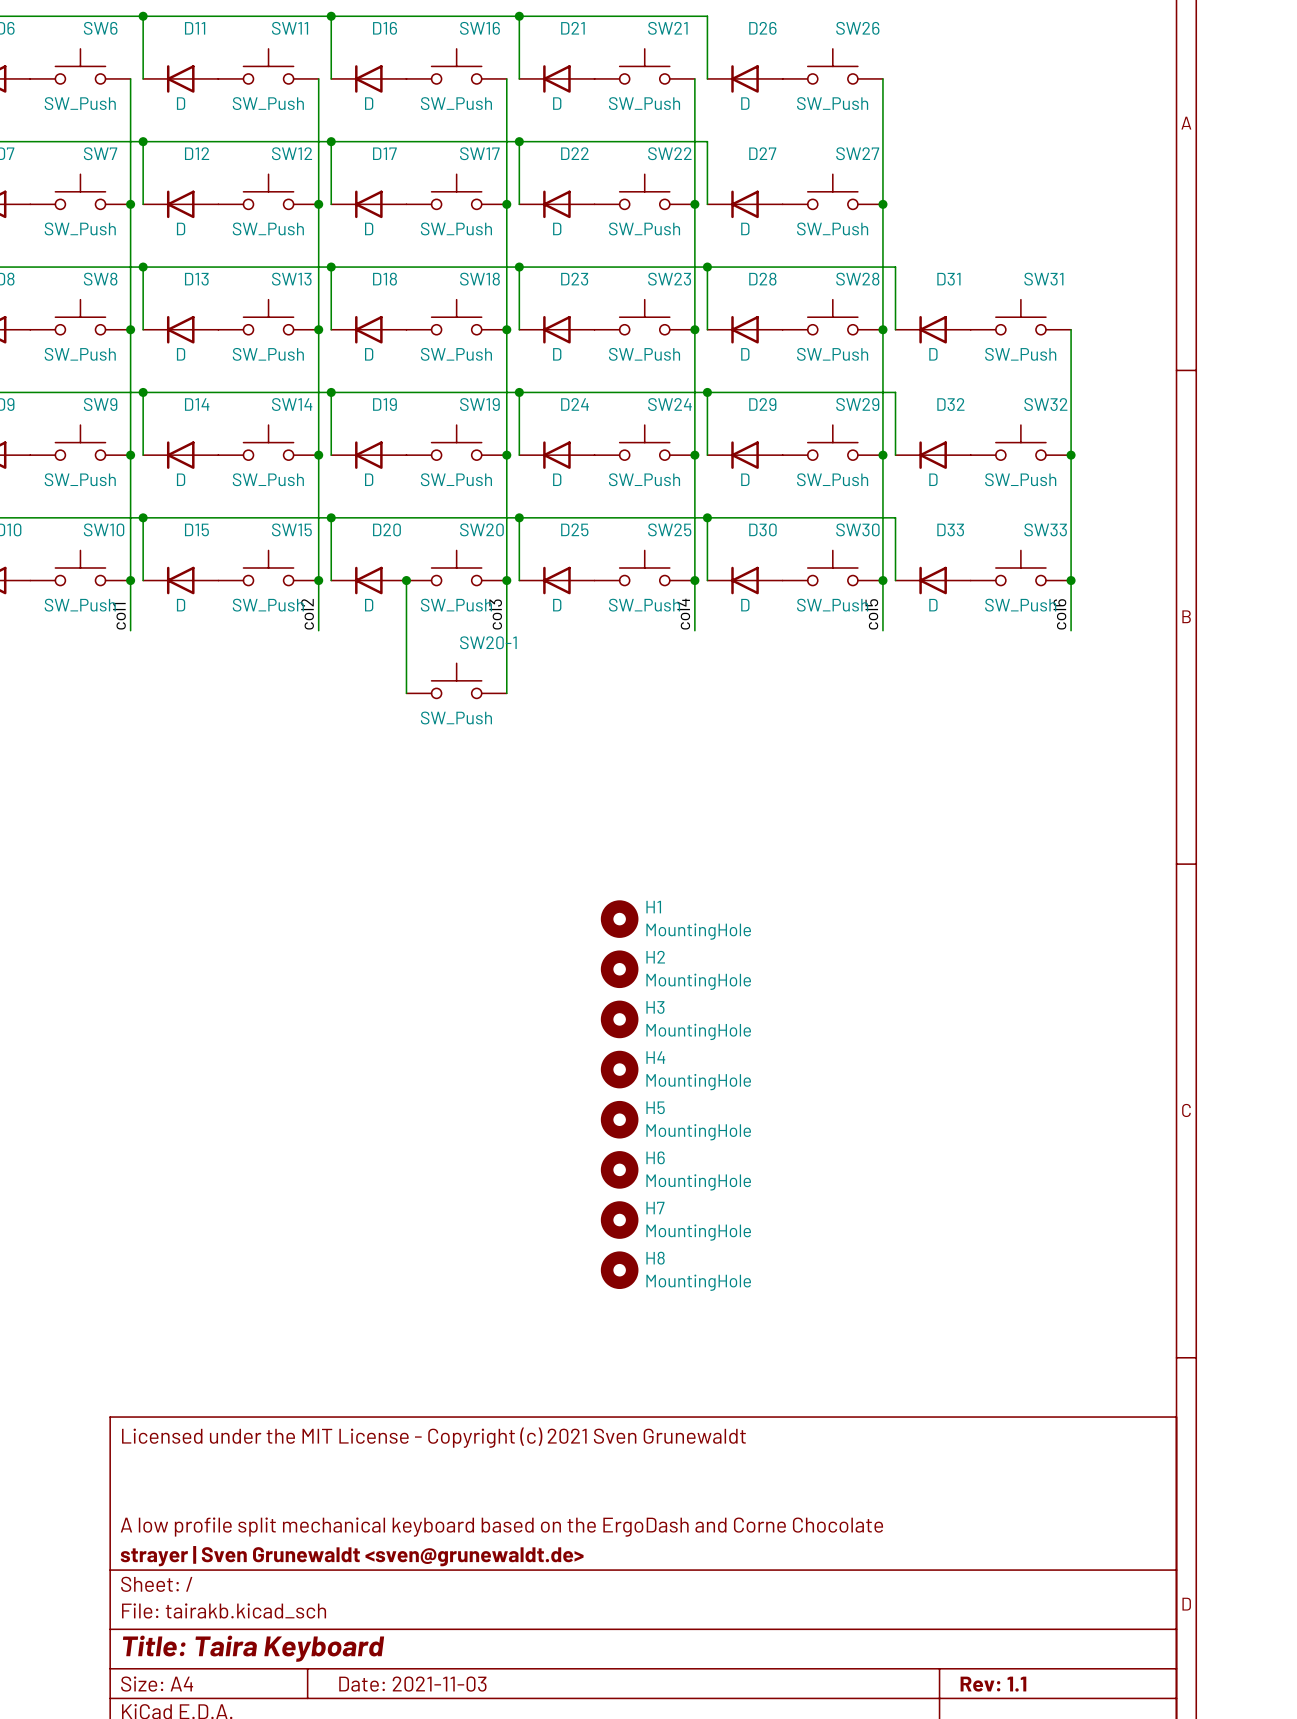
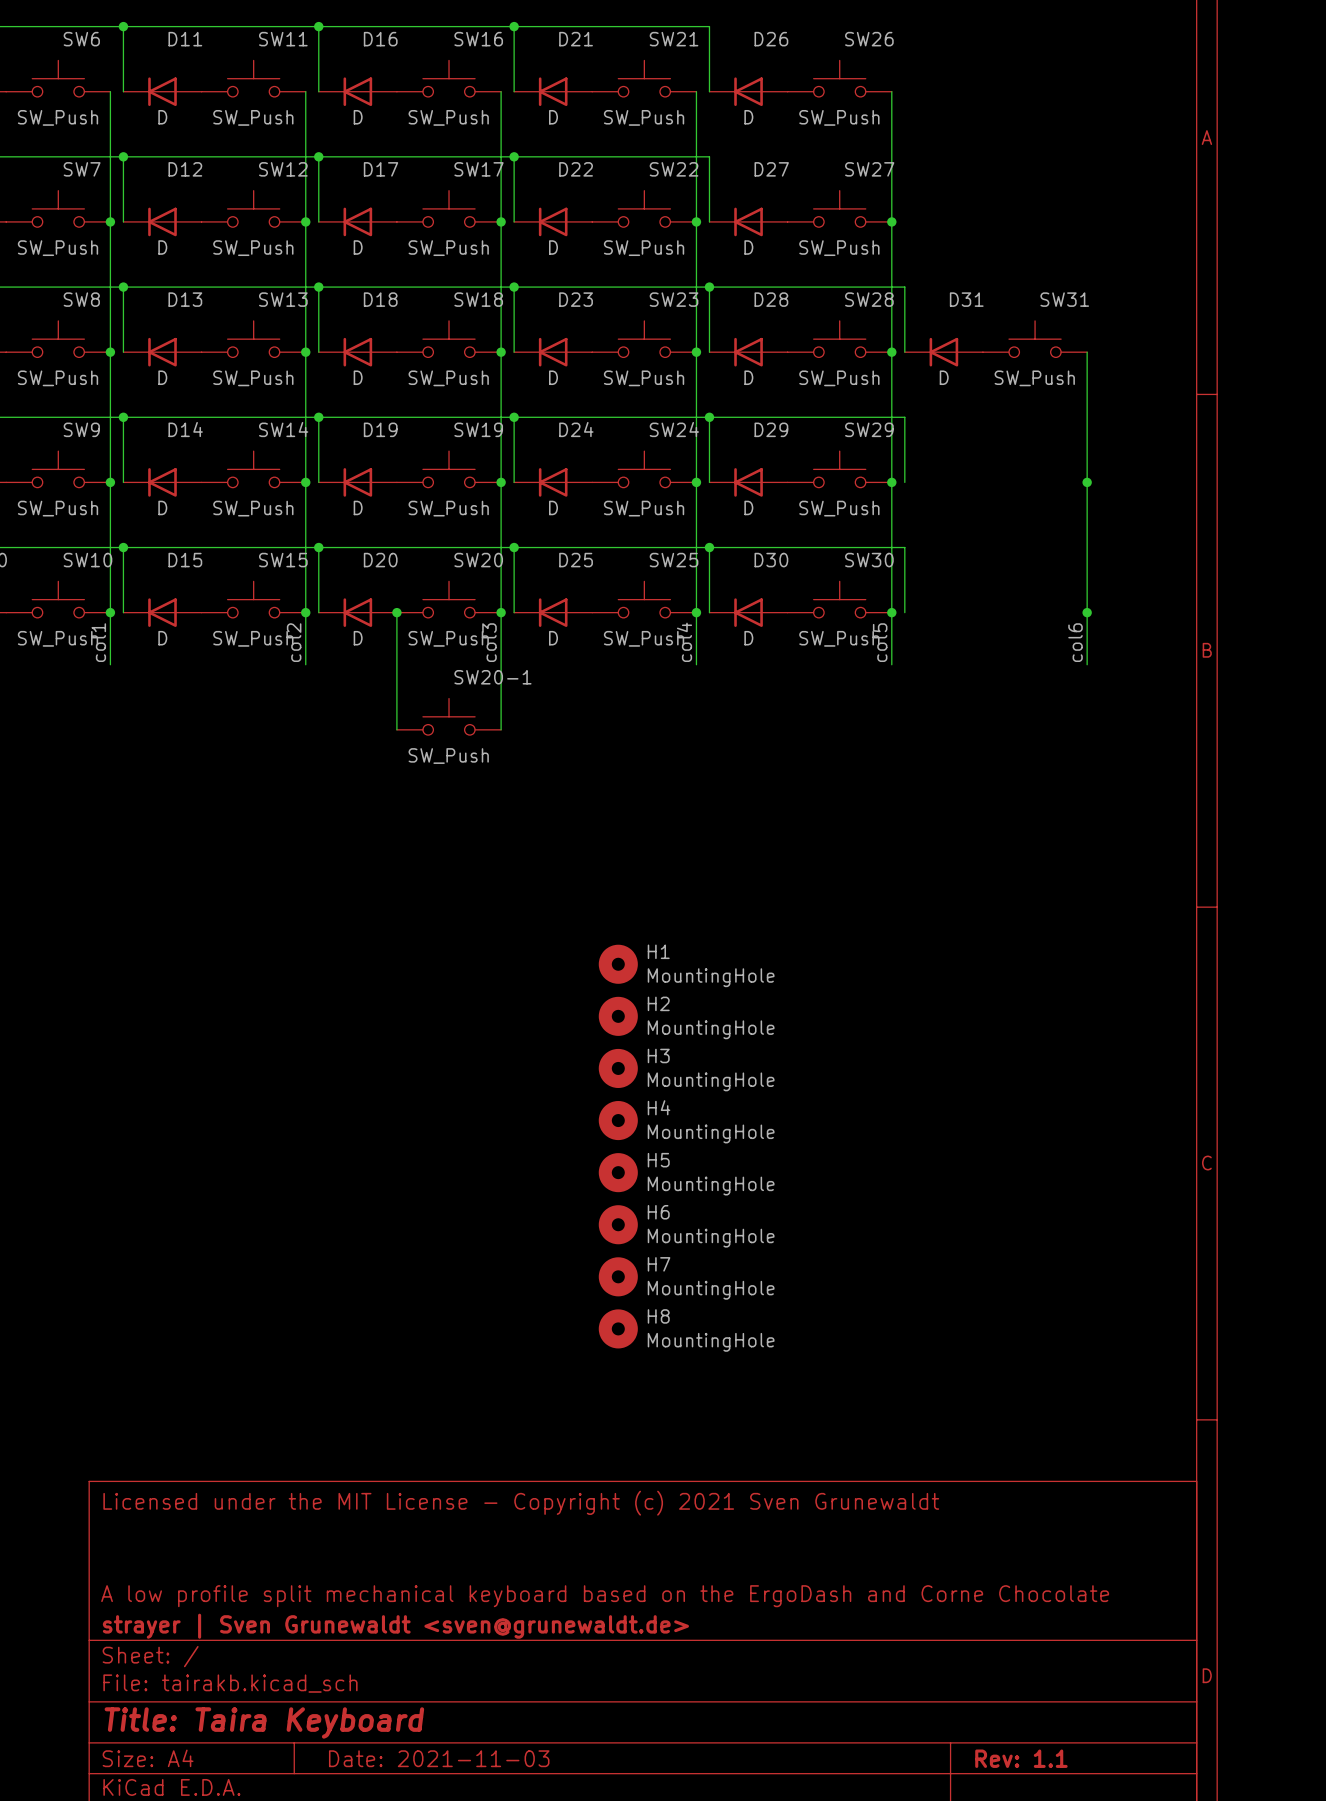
SW32: SW_Push (1020, 442) -> none
D32: D (933, 455) -> none
SW33: SW_Push (1020, 567) -> none
D33: D (933, 580) -> none

